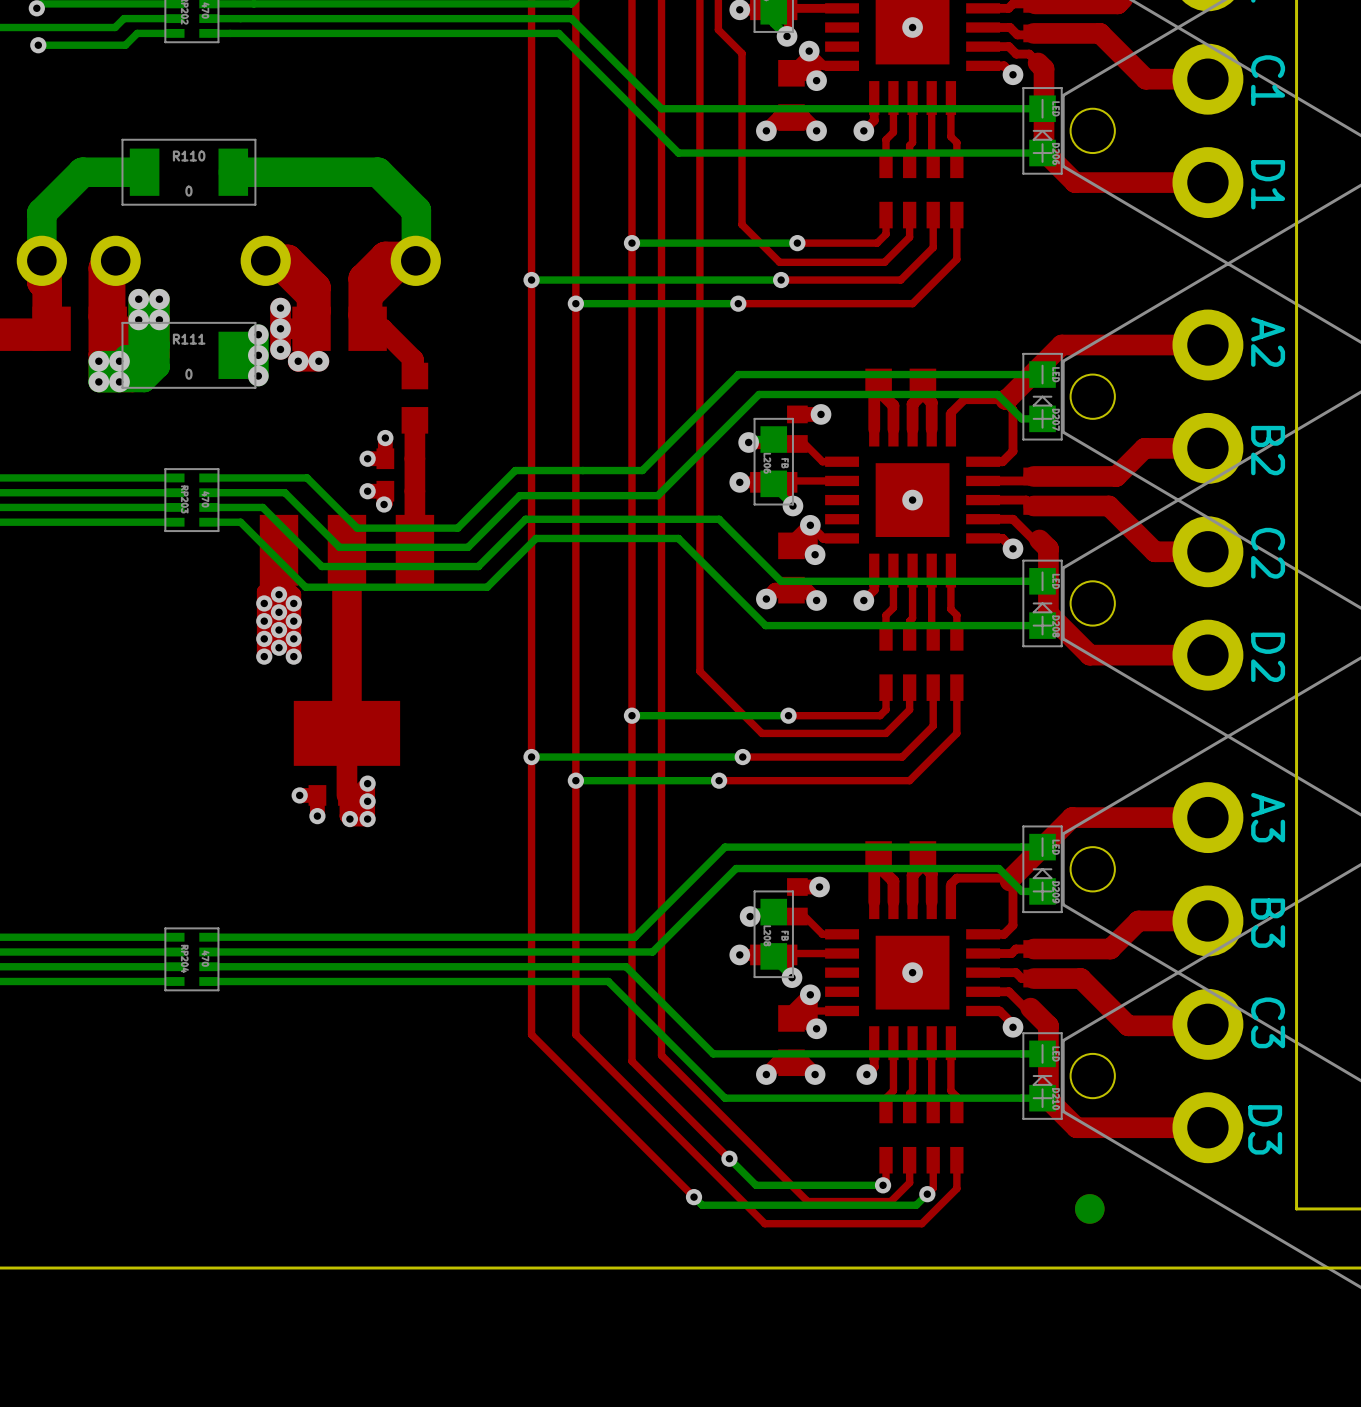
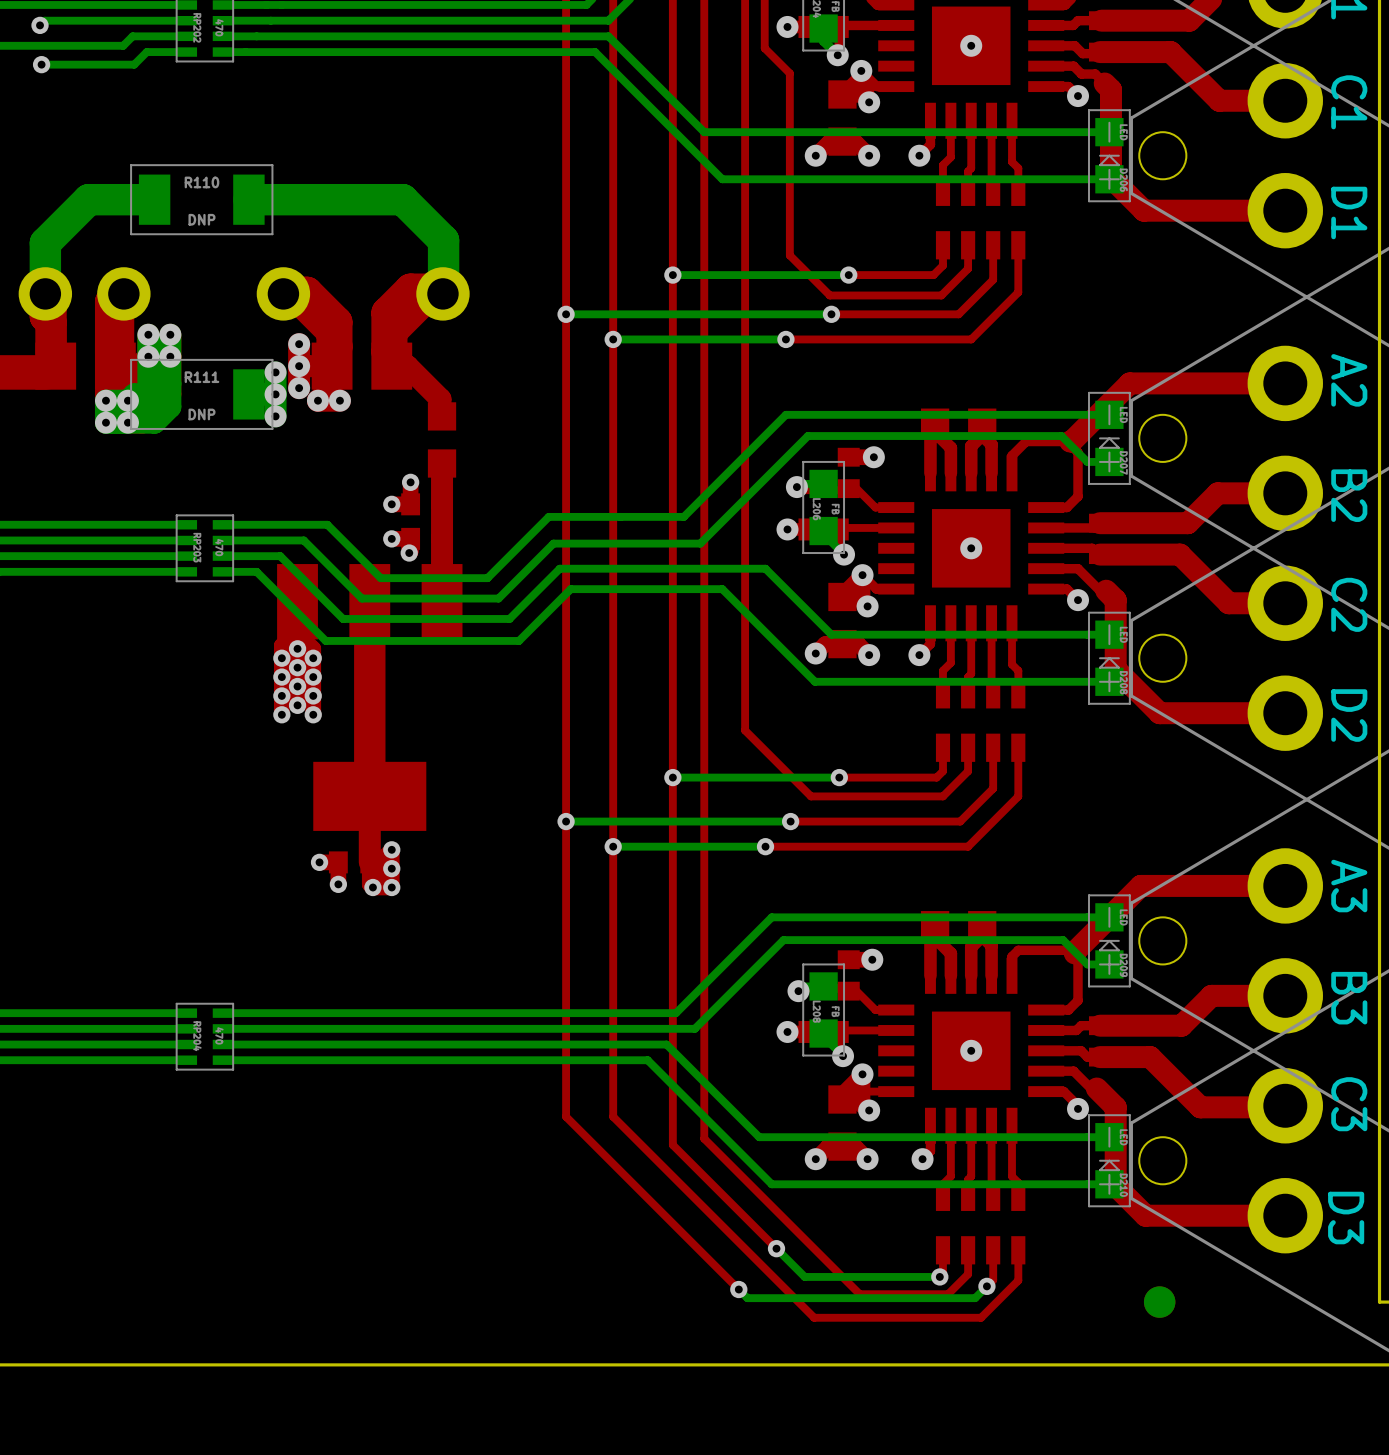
R110 value: 0 (188, 191) -> DNP (201, 219)
R111 value: 0 (188, 374) -> DNP (201, 414)

